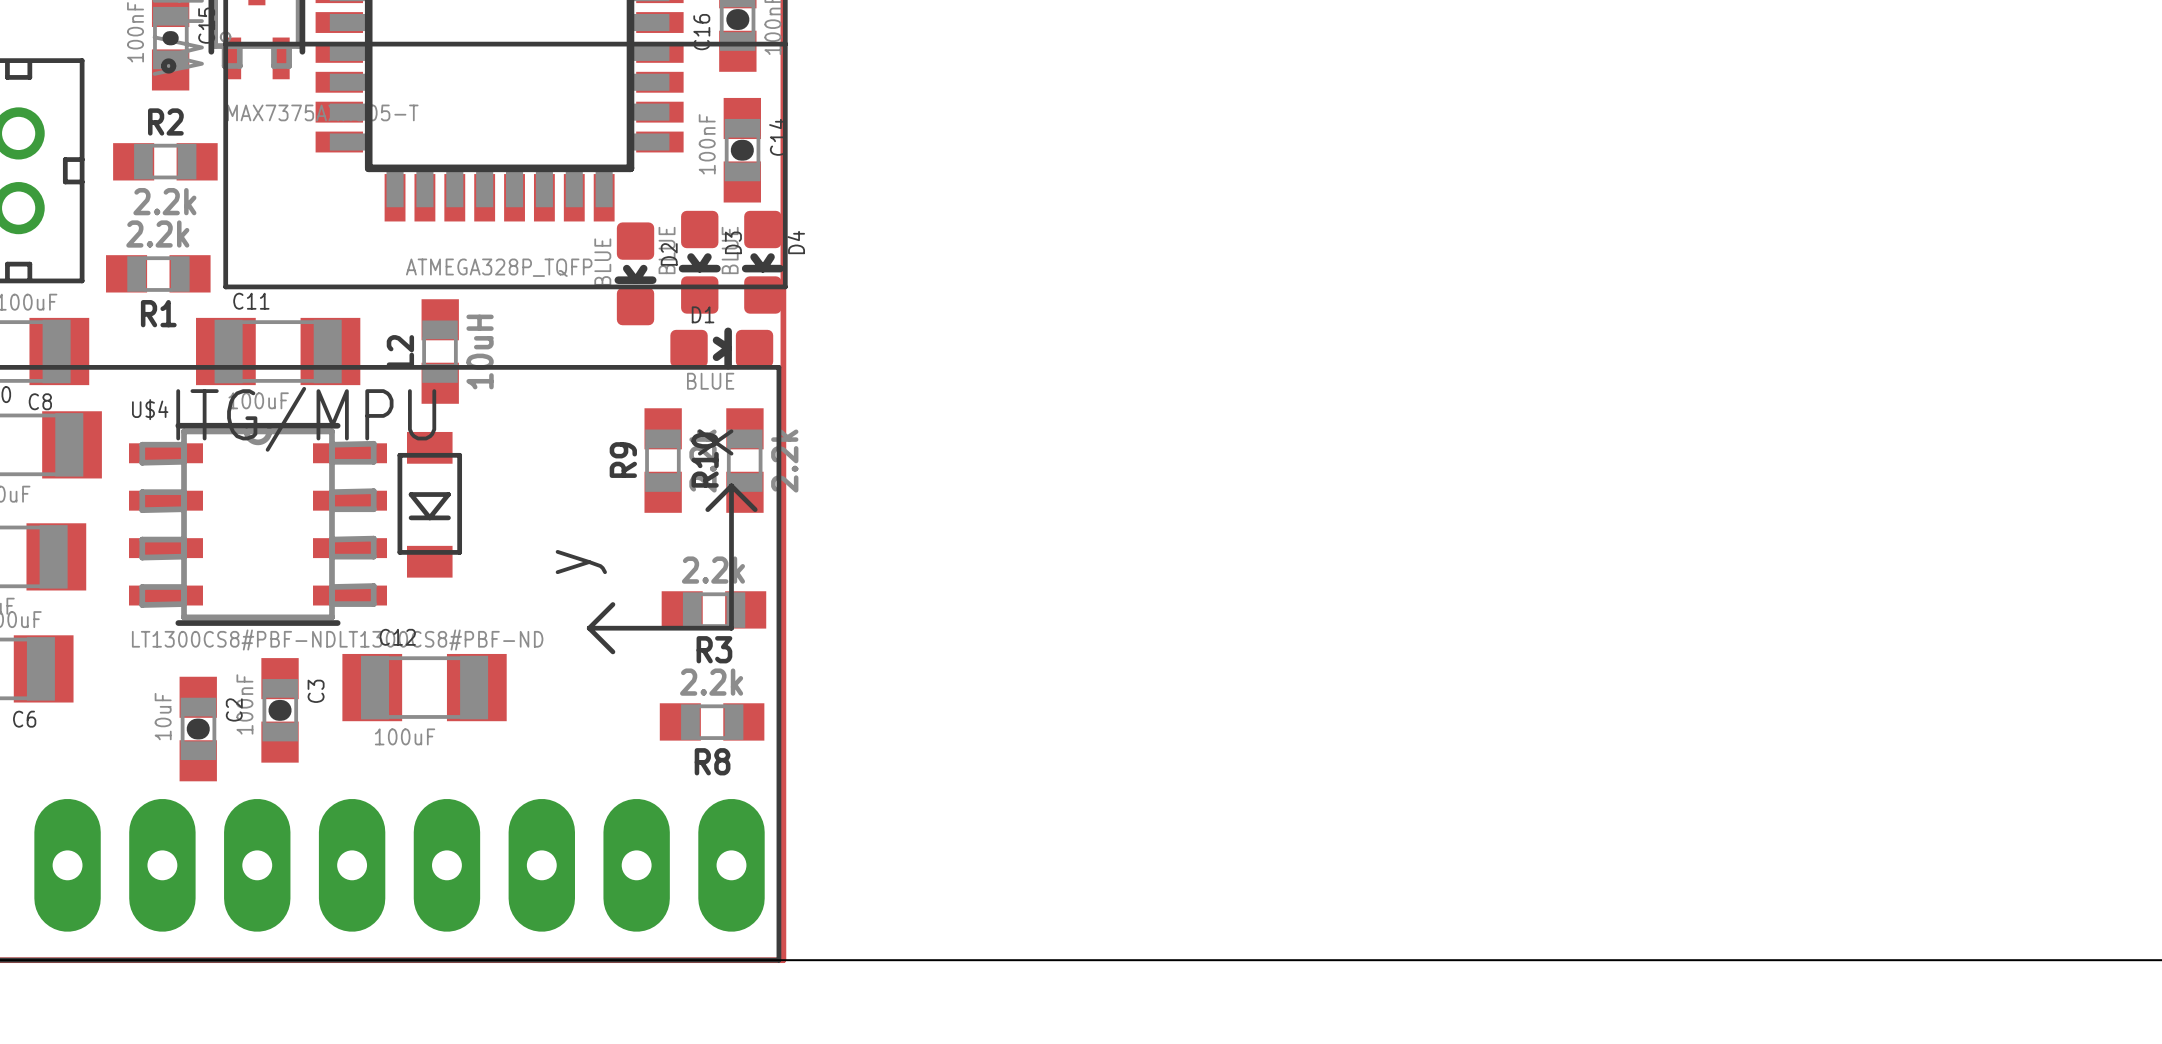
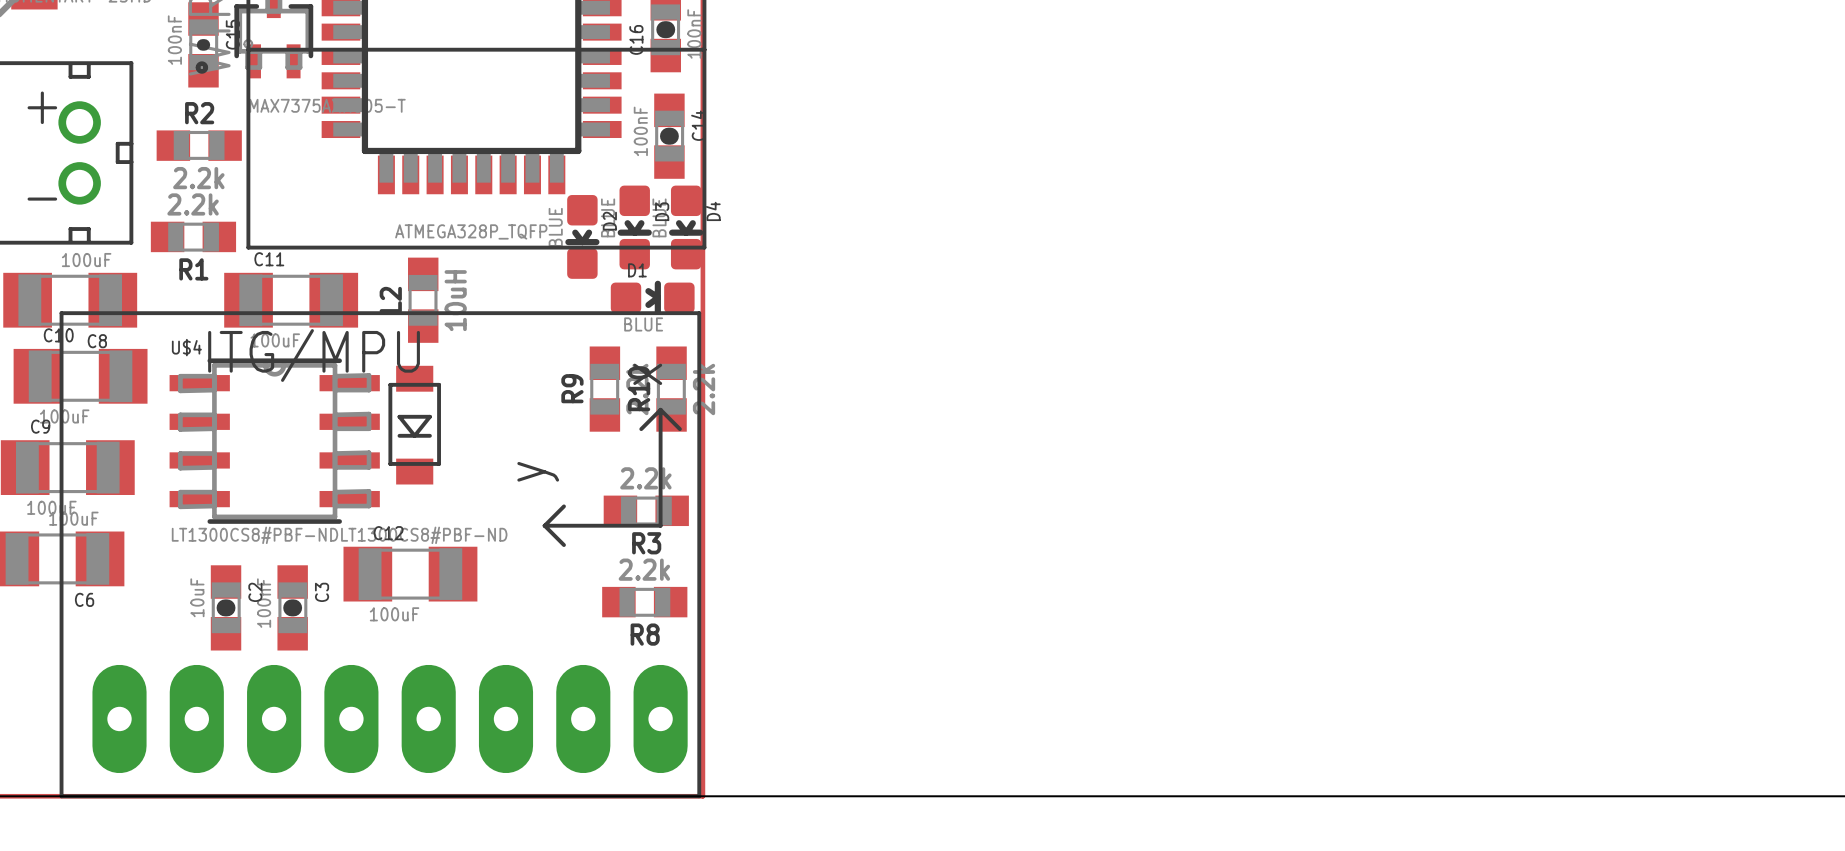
C3 position: (280, 710) -> (292, 607)

